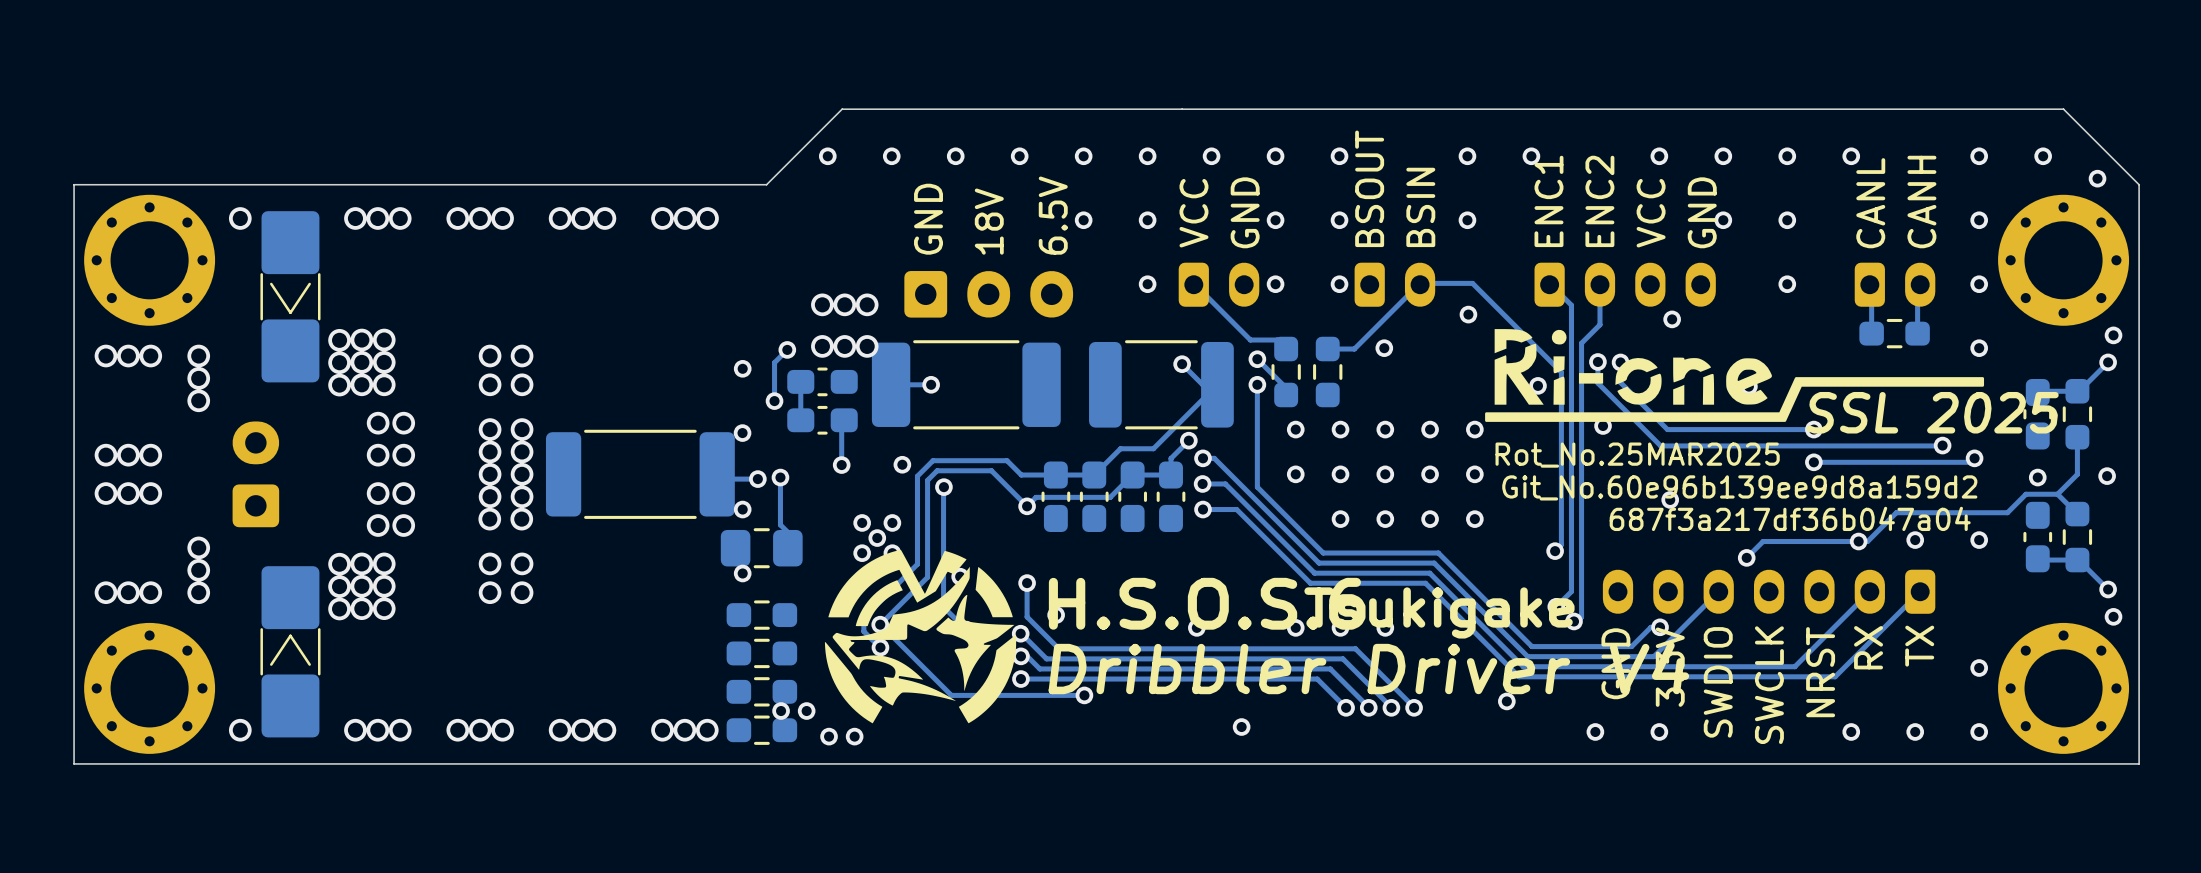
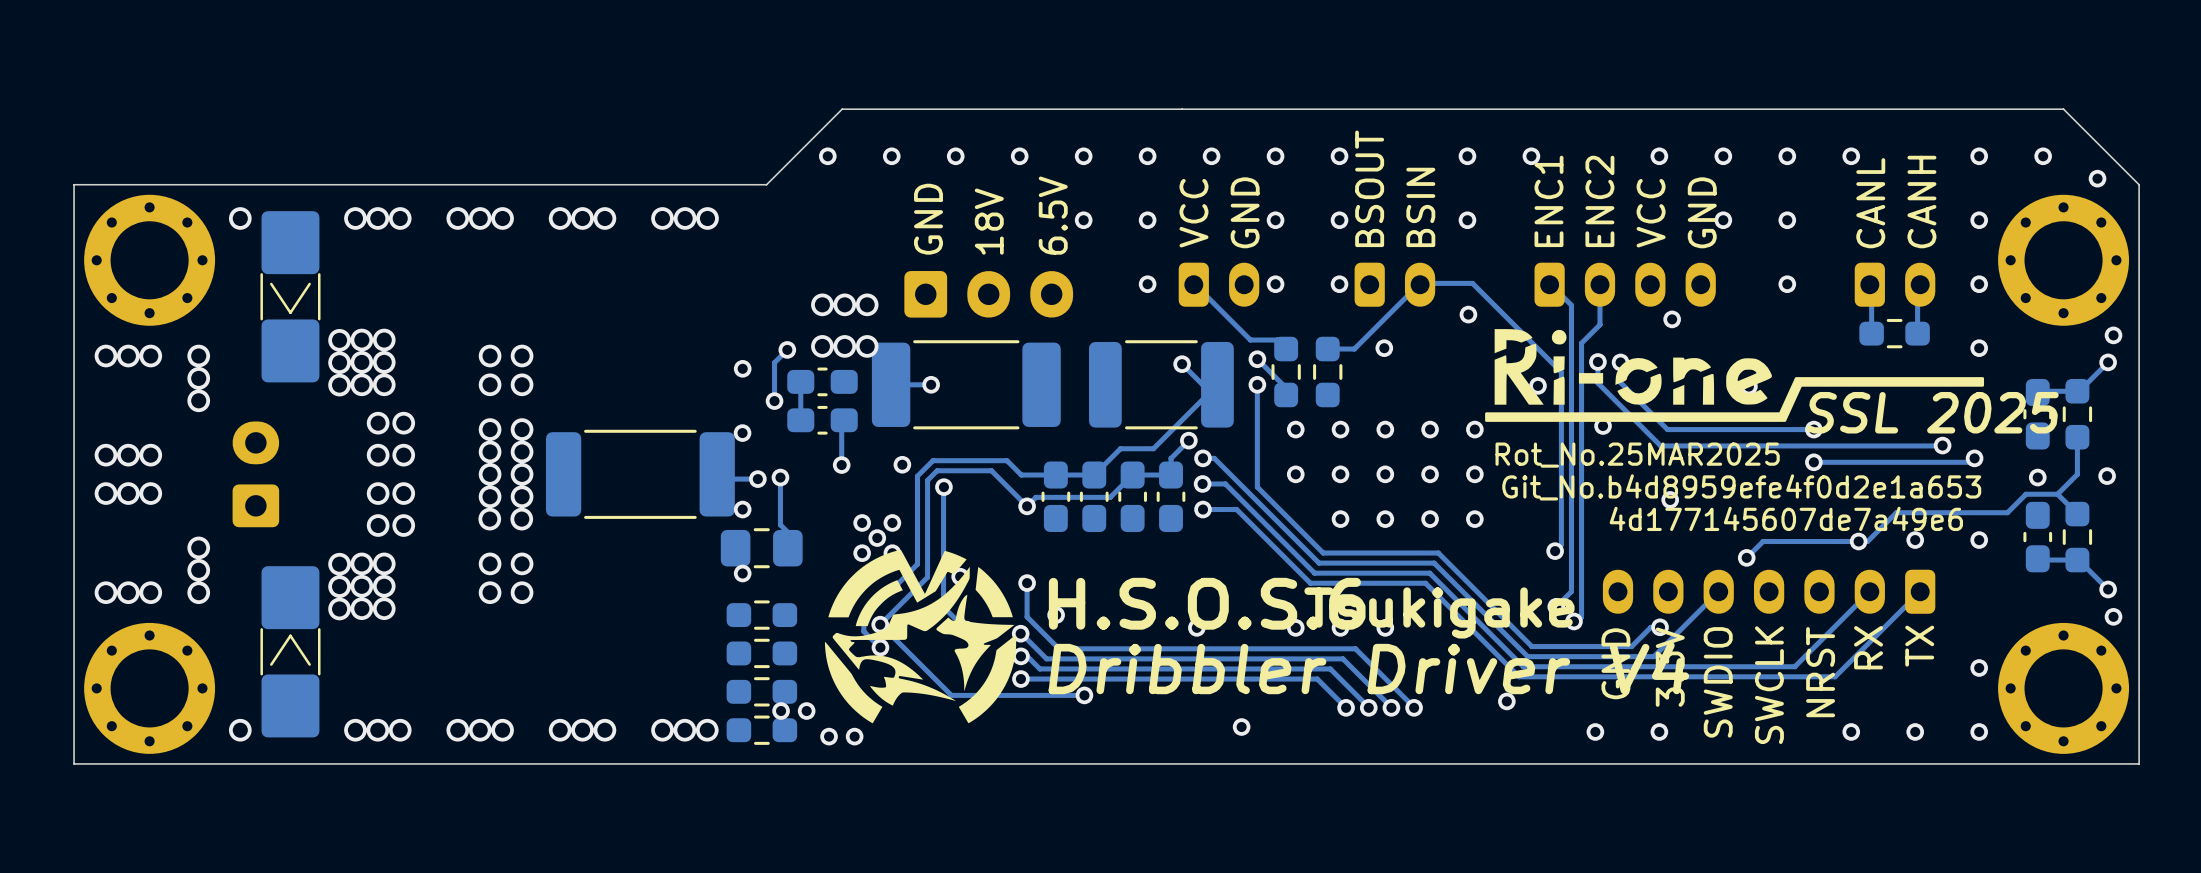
text: Git_No.60e96b139ee9d8a159d2 (1739, 487) -> Git_No.b4d8959efe4f0d2e1a653 (1741, 487)
text: 687f3a217df36b047a04 (1790, 518) -> 4d177145607de7a49e6 (1786, 518)

